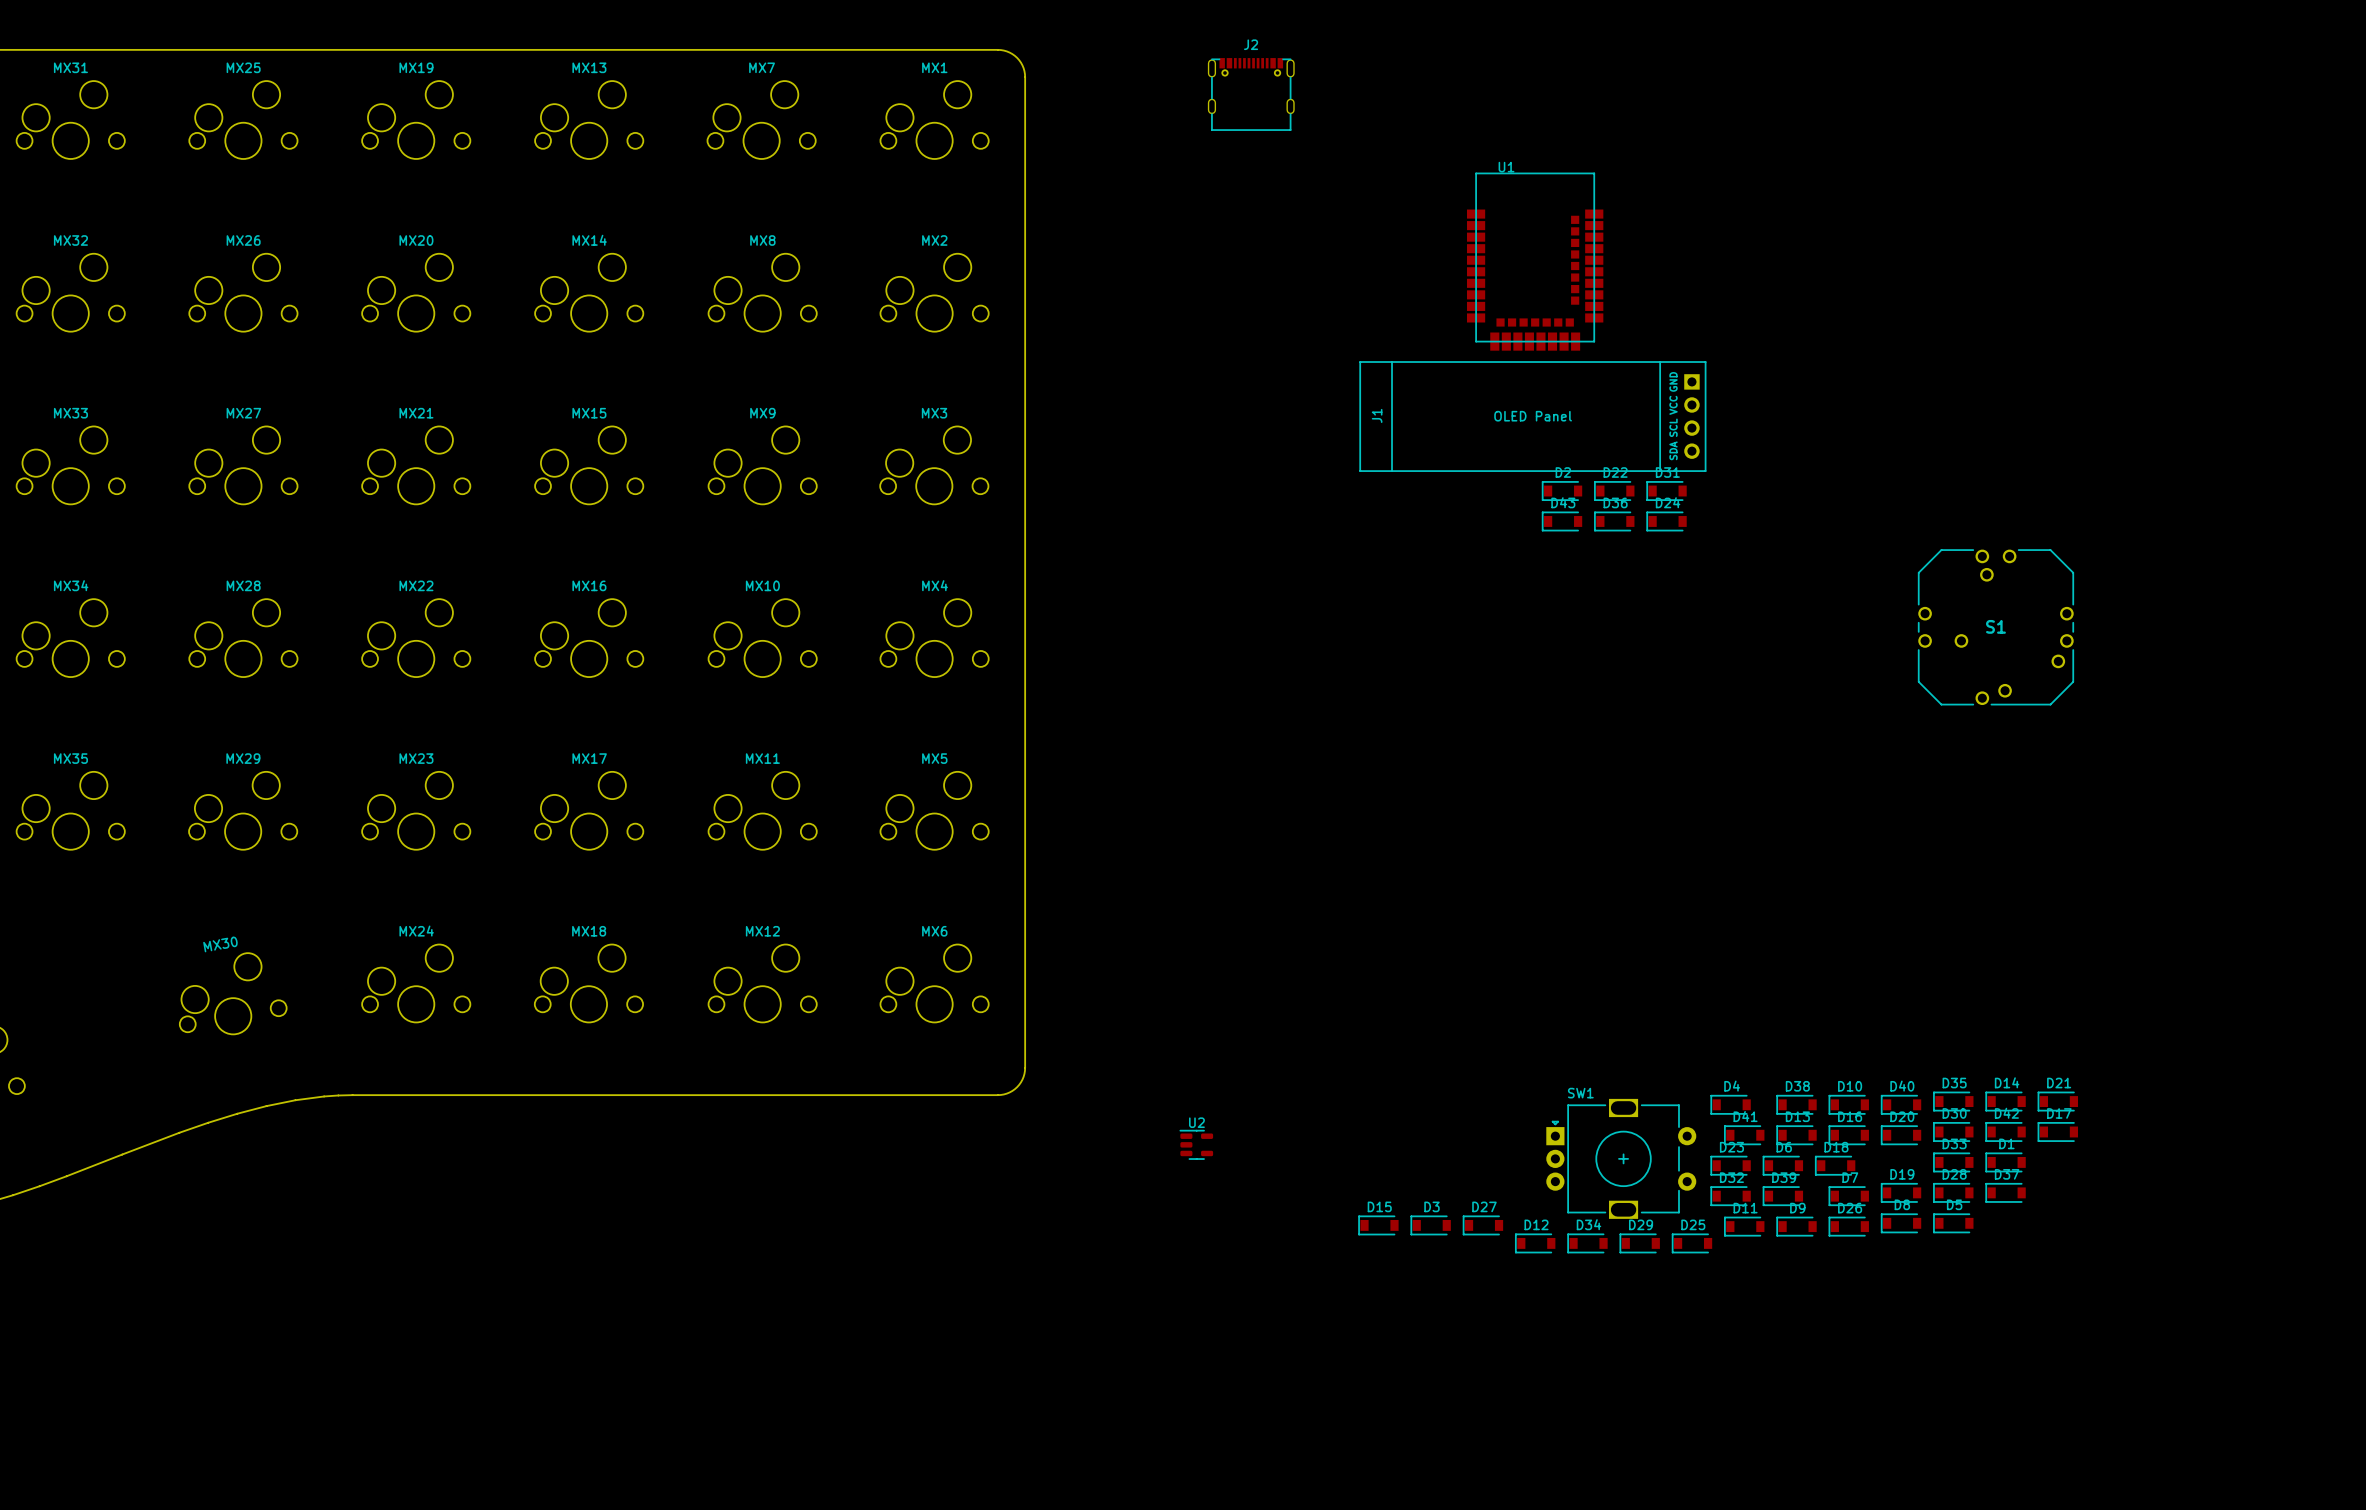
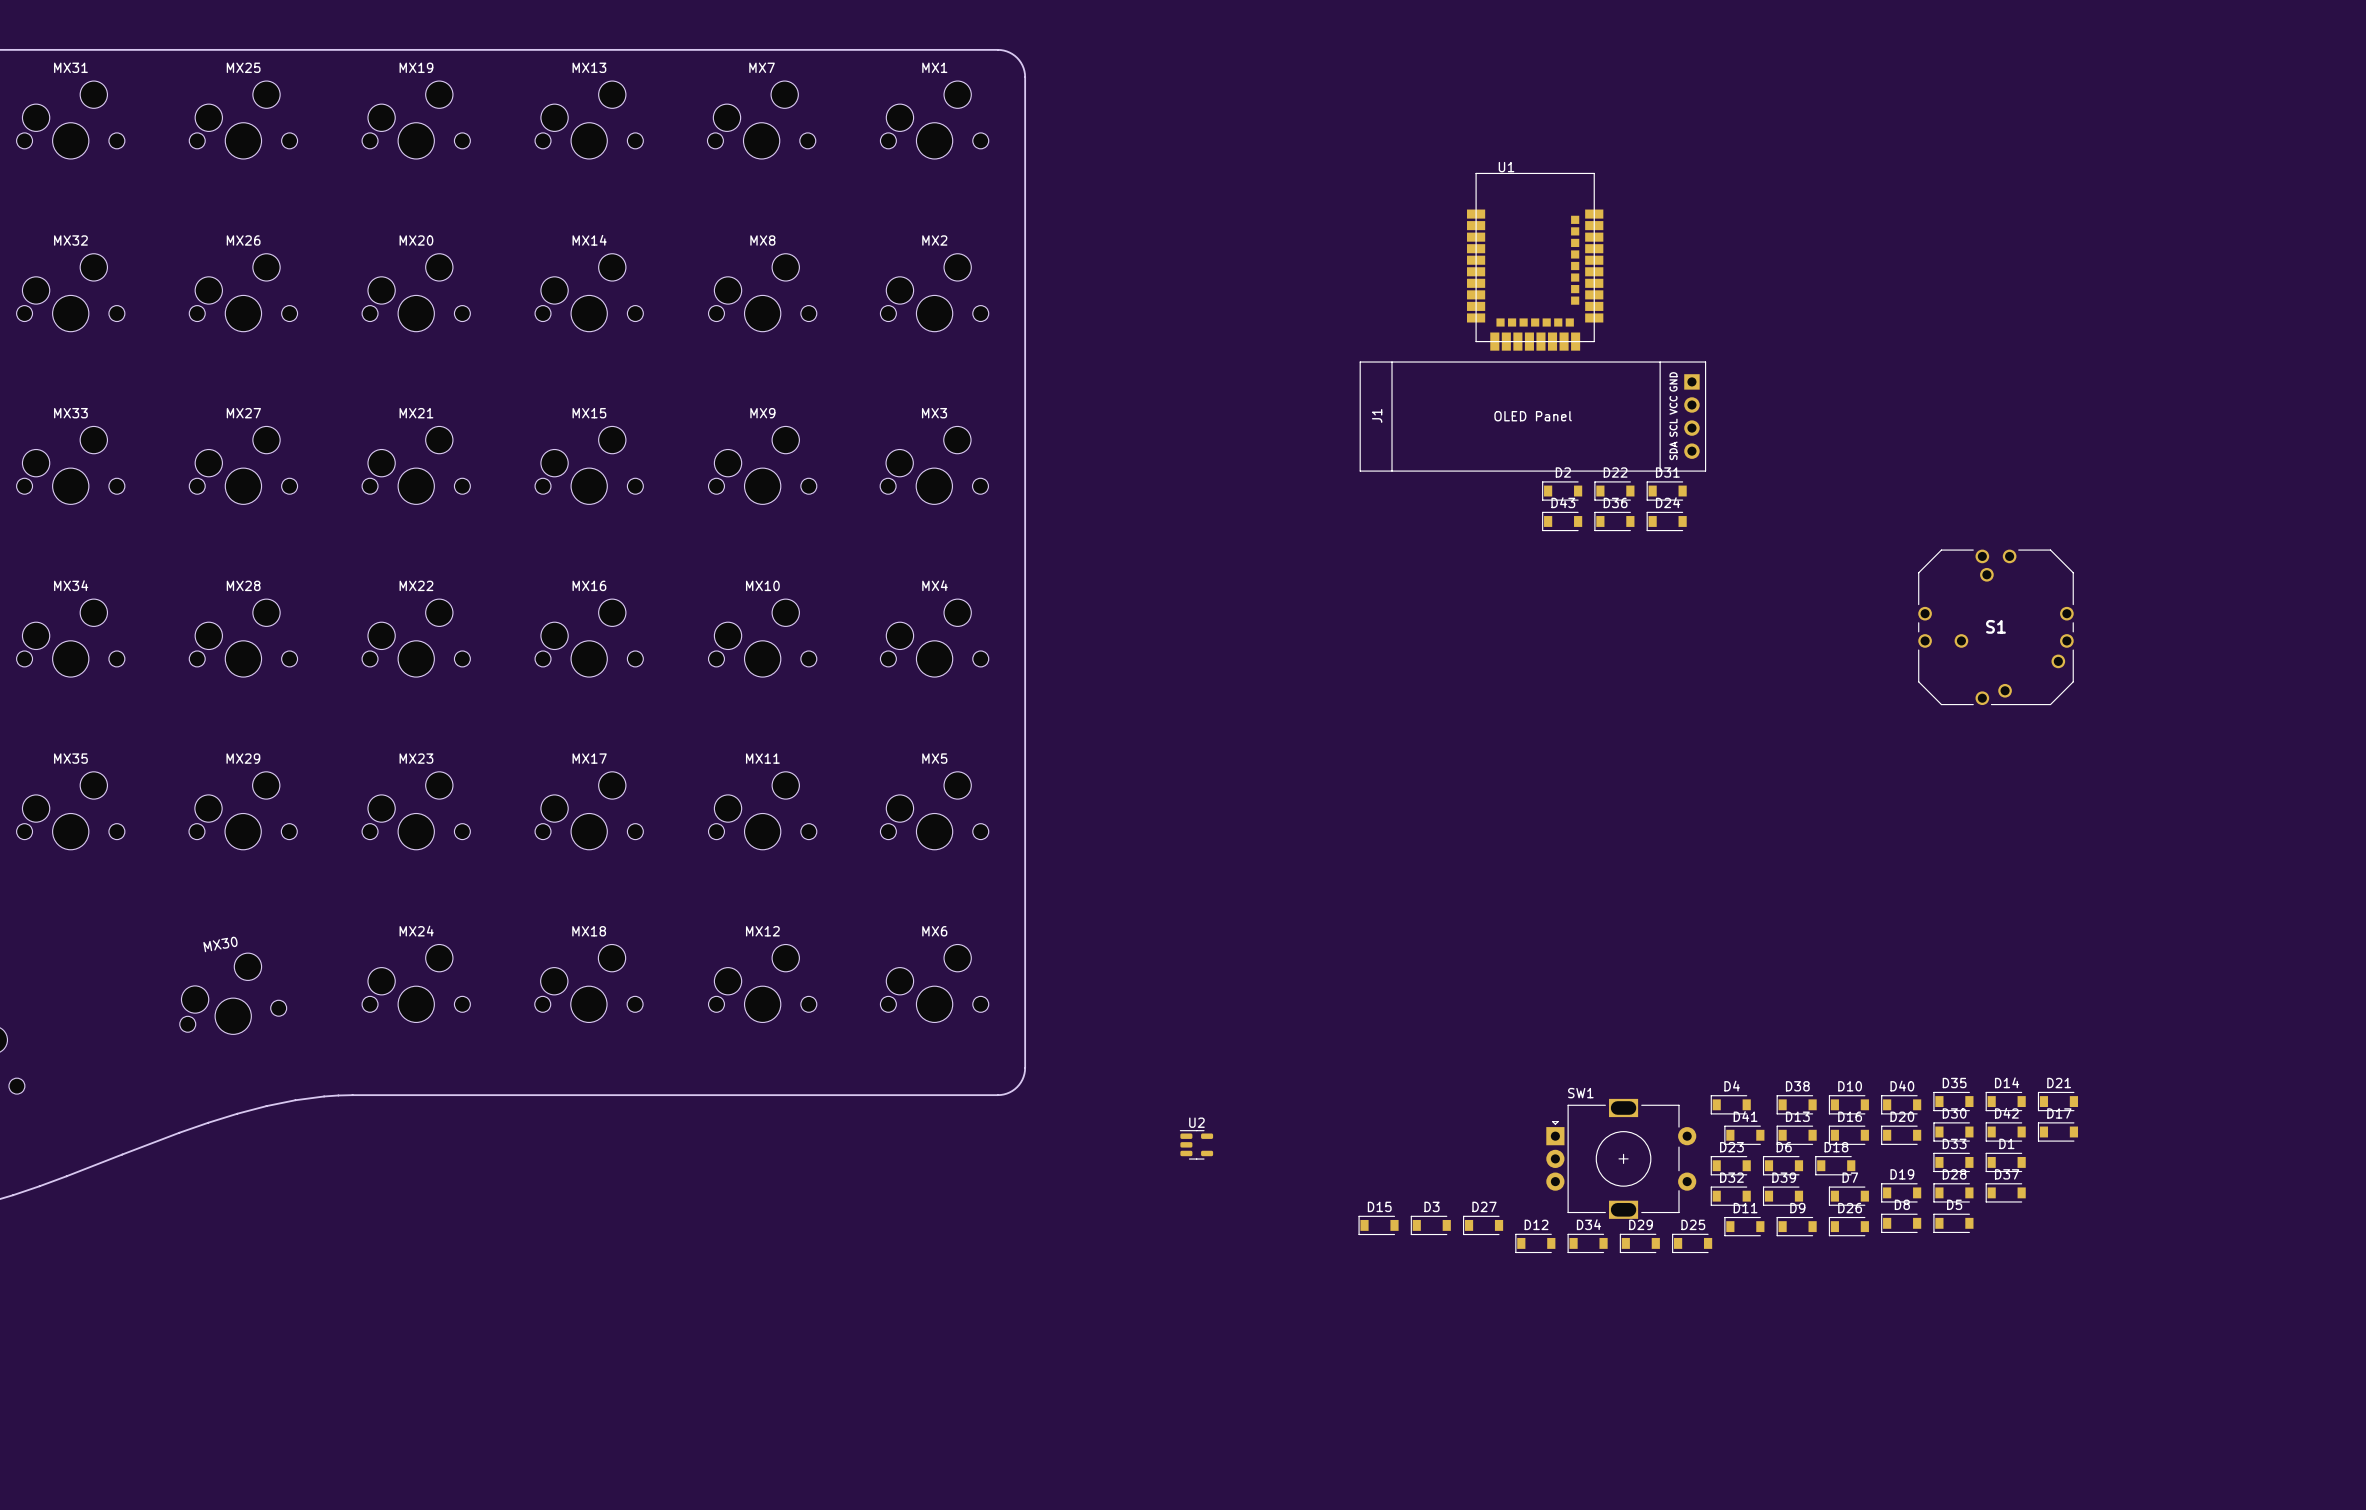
J2: (1251, 94) -> none

